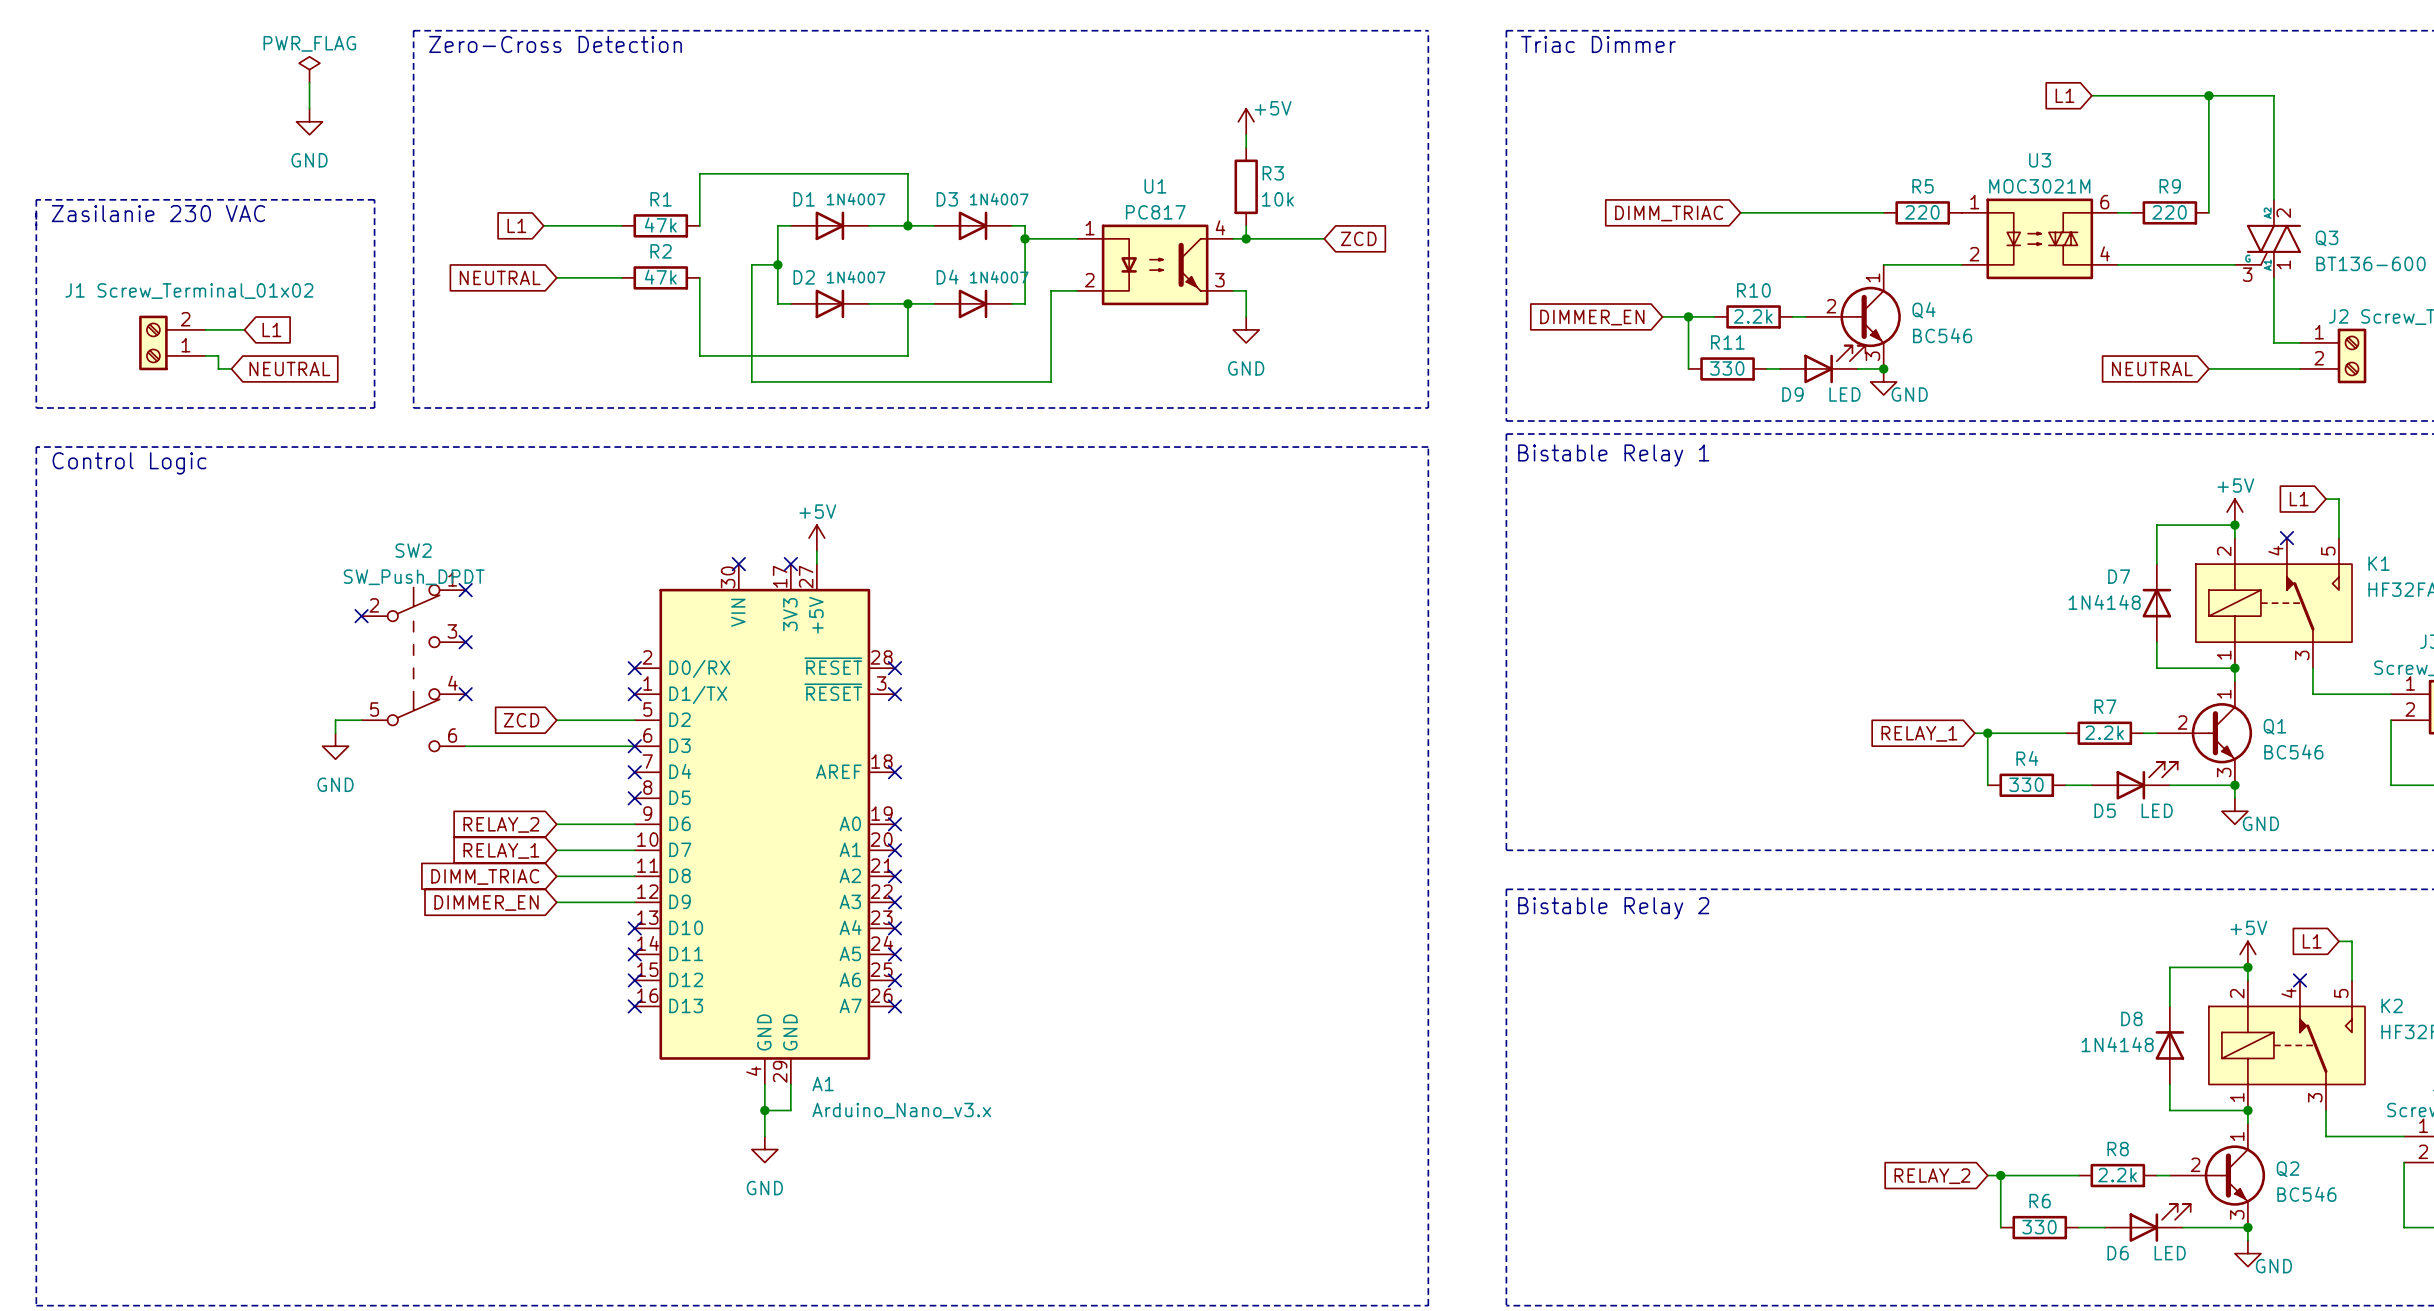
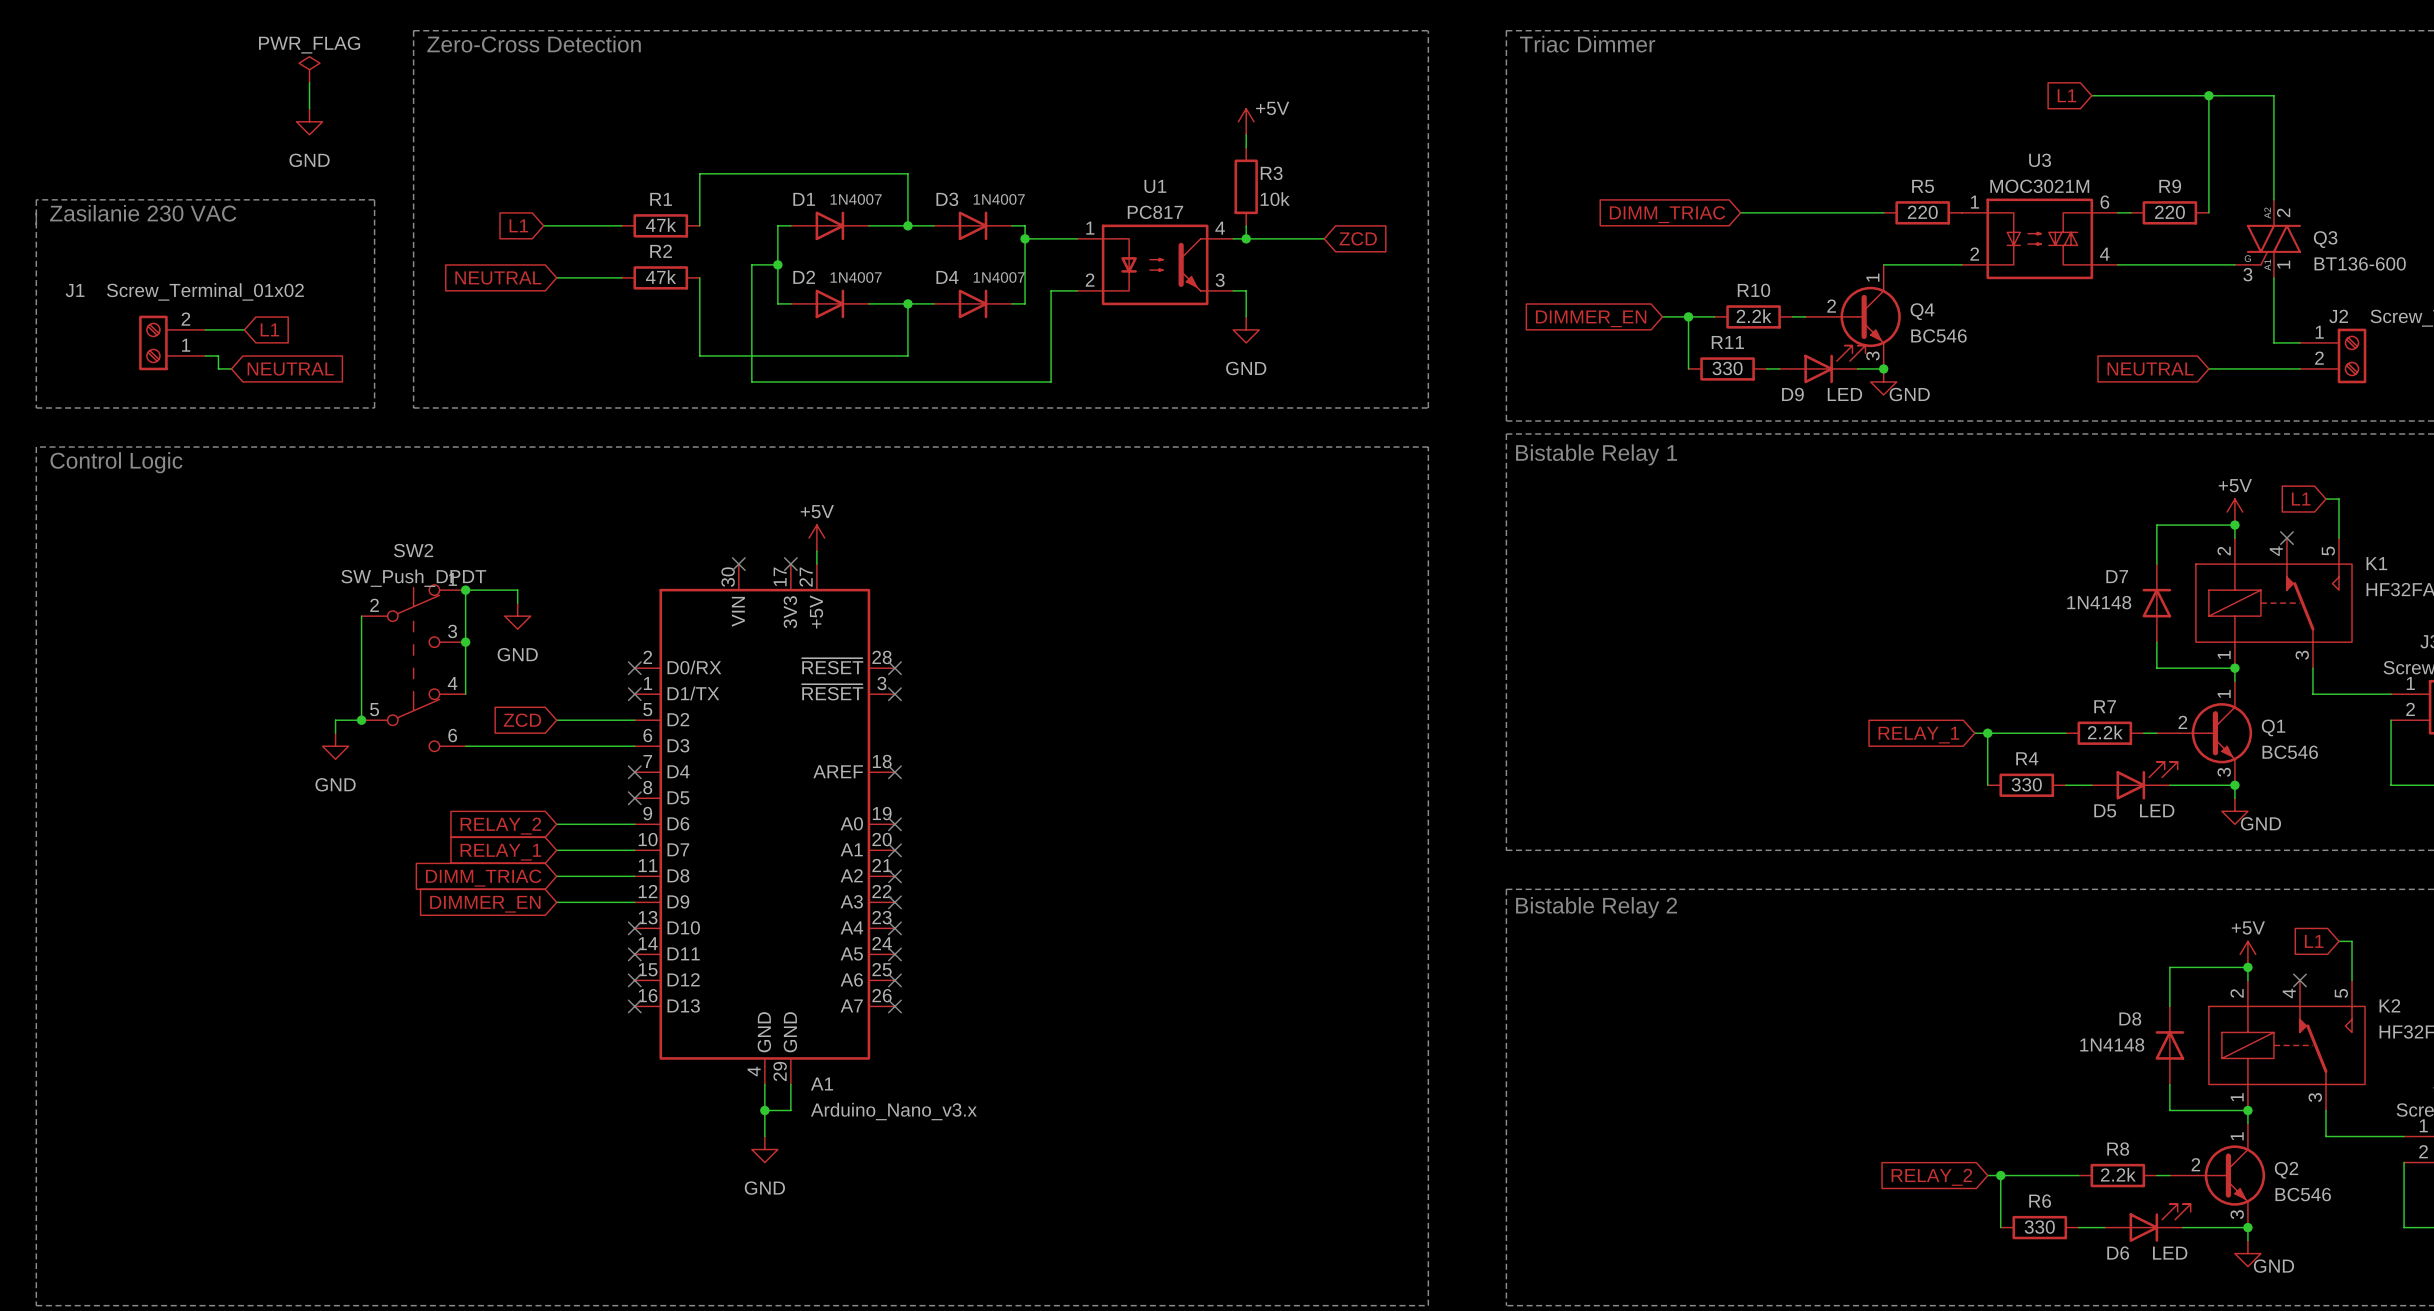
no-connect mark: (465, 590) -> none
junction: none -> (465, 590)
wire: none -> (517, 603) (517, 590) (465, 590) (465, 694)
wire: none -> (361, 616) (361, 720)
no-connect mark: (361, 616) -> none
power symbol: none -> GND (517, 616)
no-connect mark: (465, 642) -> none
junction: none -> (465, 642)
no-connect mark: (465, 694) -> none
junction: none -> (361, 720)
no-connect mark: (634, 746) -> none

